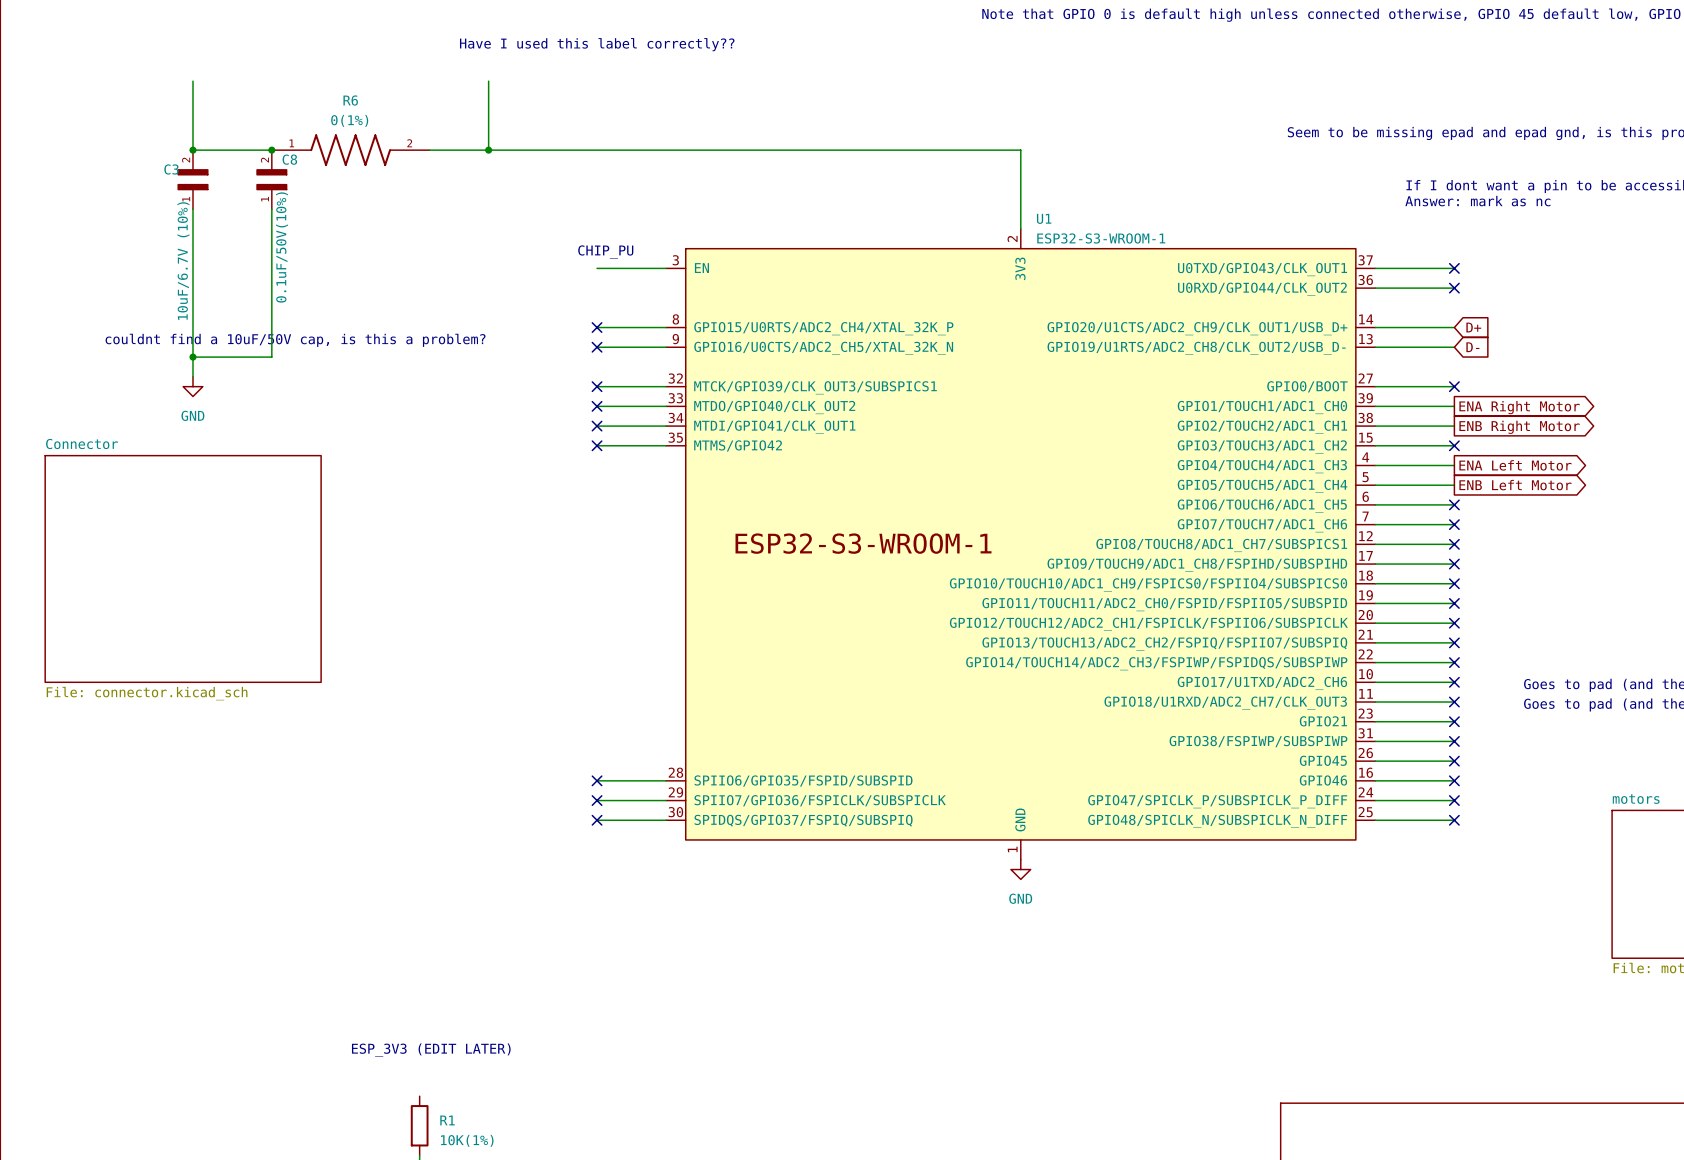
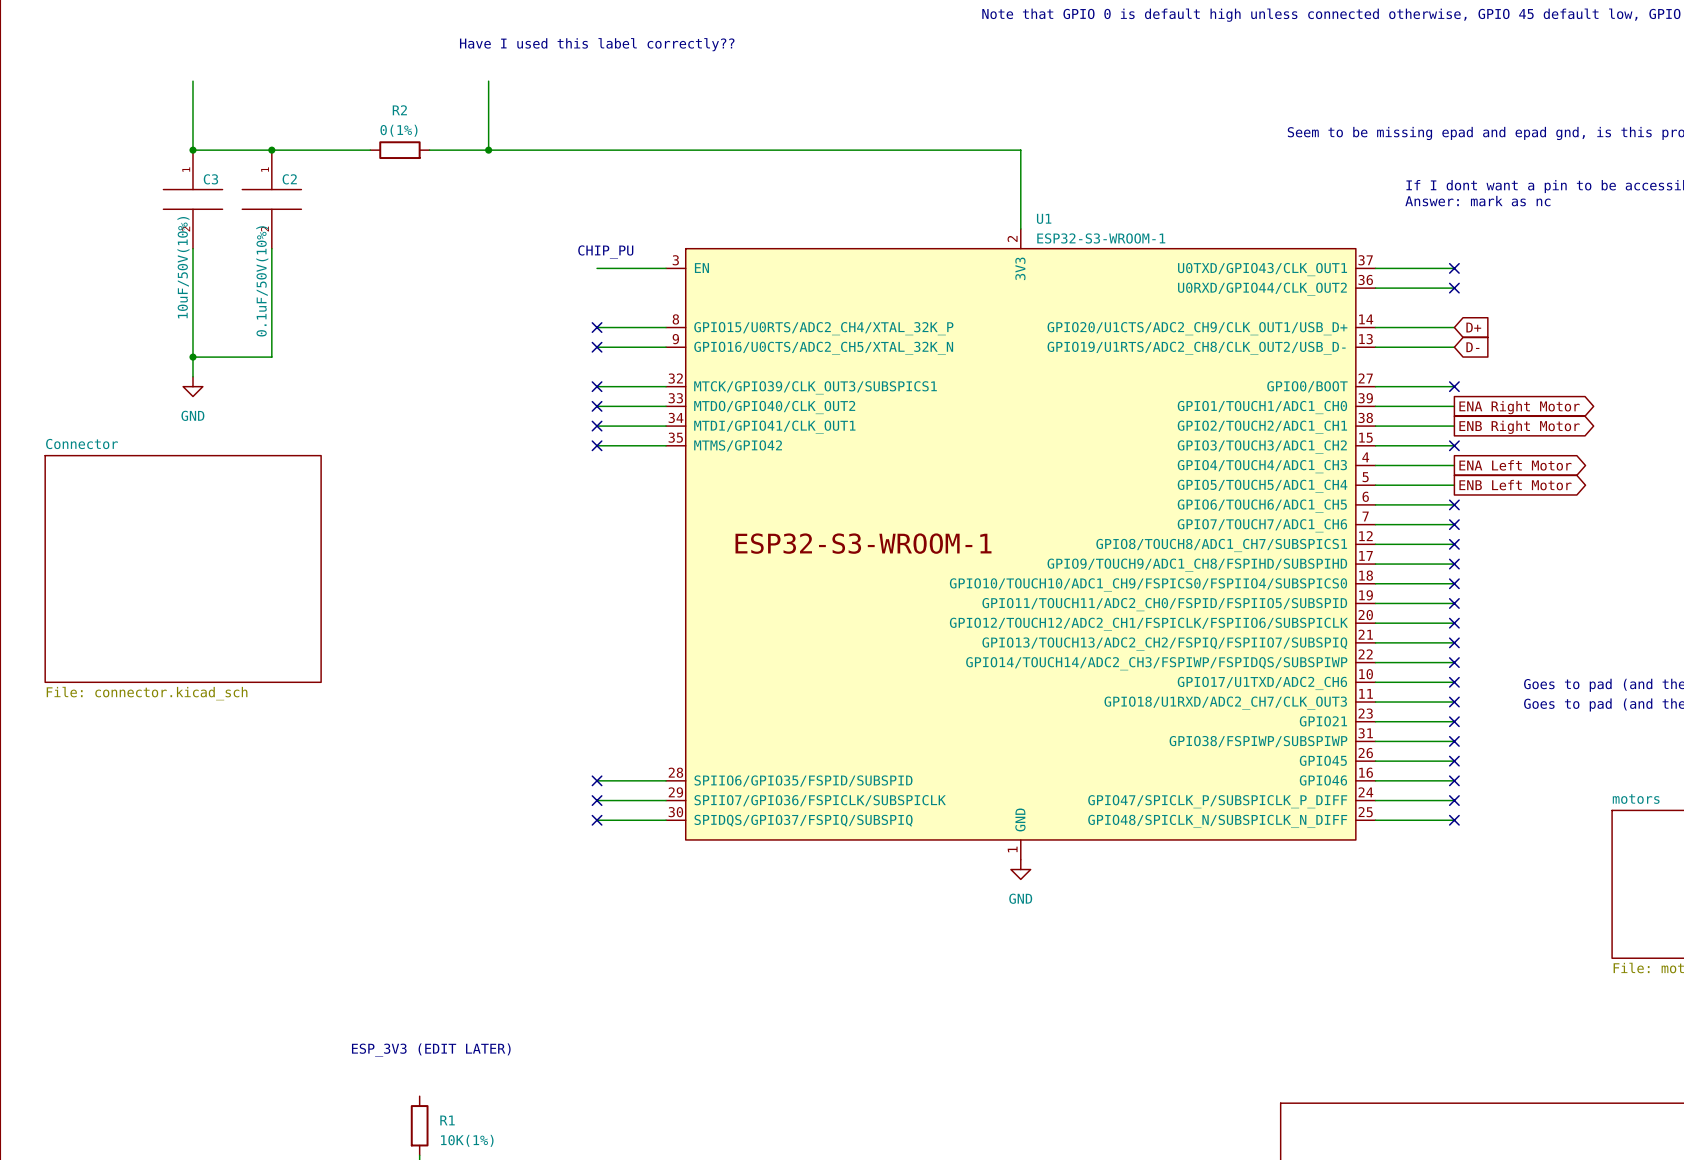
C3 symbol: [177, 150, 209, 210] -> [163, 150, 223, 249]
R6: 0(1%) (350, 150) -> none
R2: none -> 0(1%) (399, 150)
C3 name position: C3 (171, 169) -> C3 (210, 179)
C8: 0.1uF/50V(10%) (271, 179) -> none
C2: none -> 0.1uF/50V(10%) (271, 199)
C3 value: 10uF/6.7V (10%) (183, 261) -> 10uF/50V(10%) (183, 267)
text: couldnt find a 10uF/50V cap, is this a problem? (295, 340) -> none

